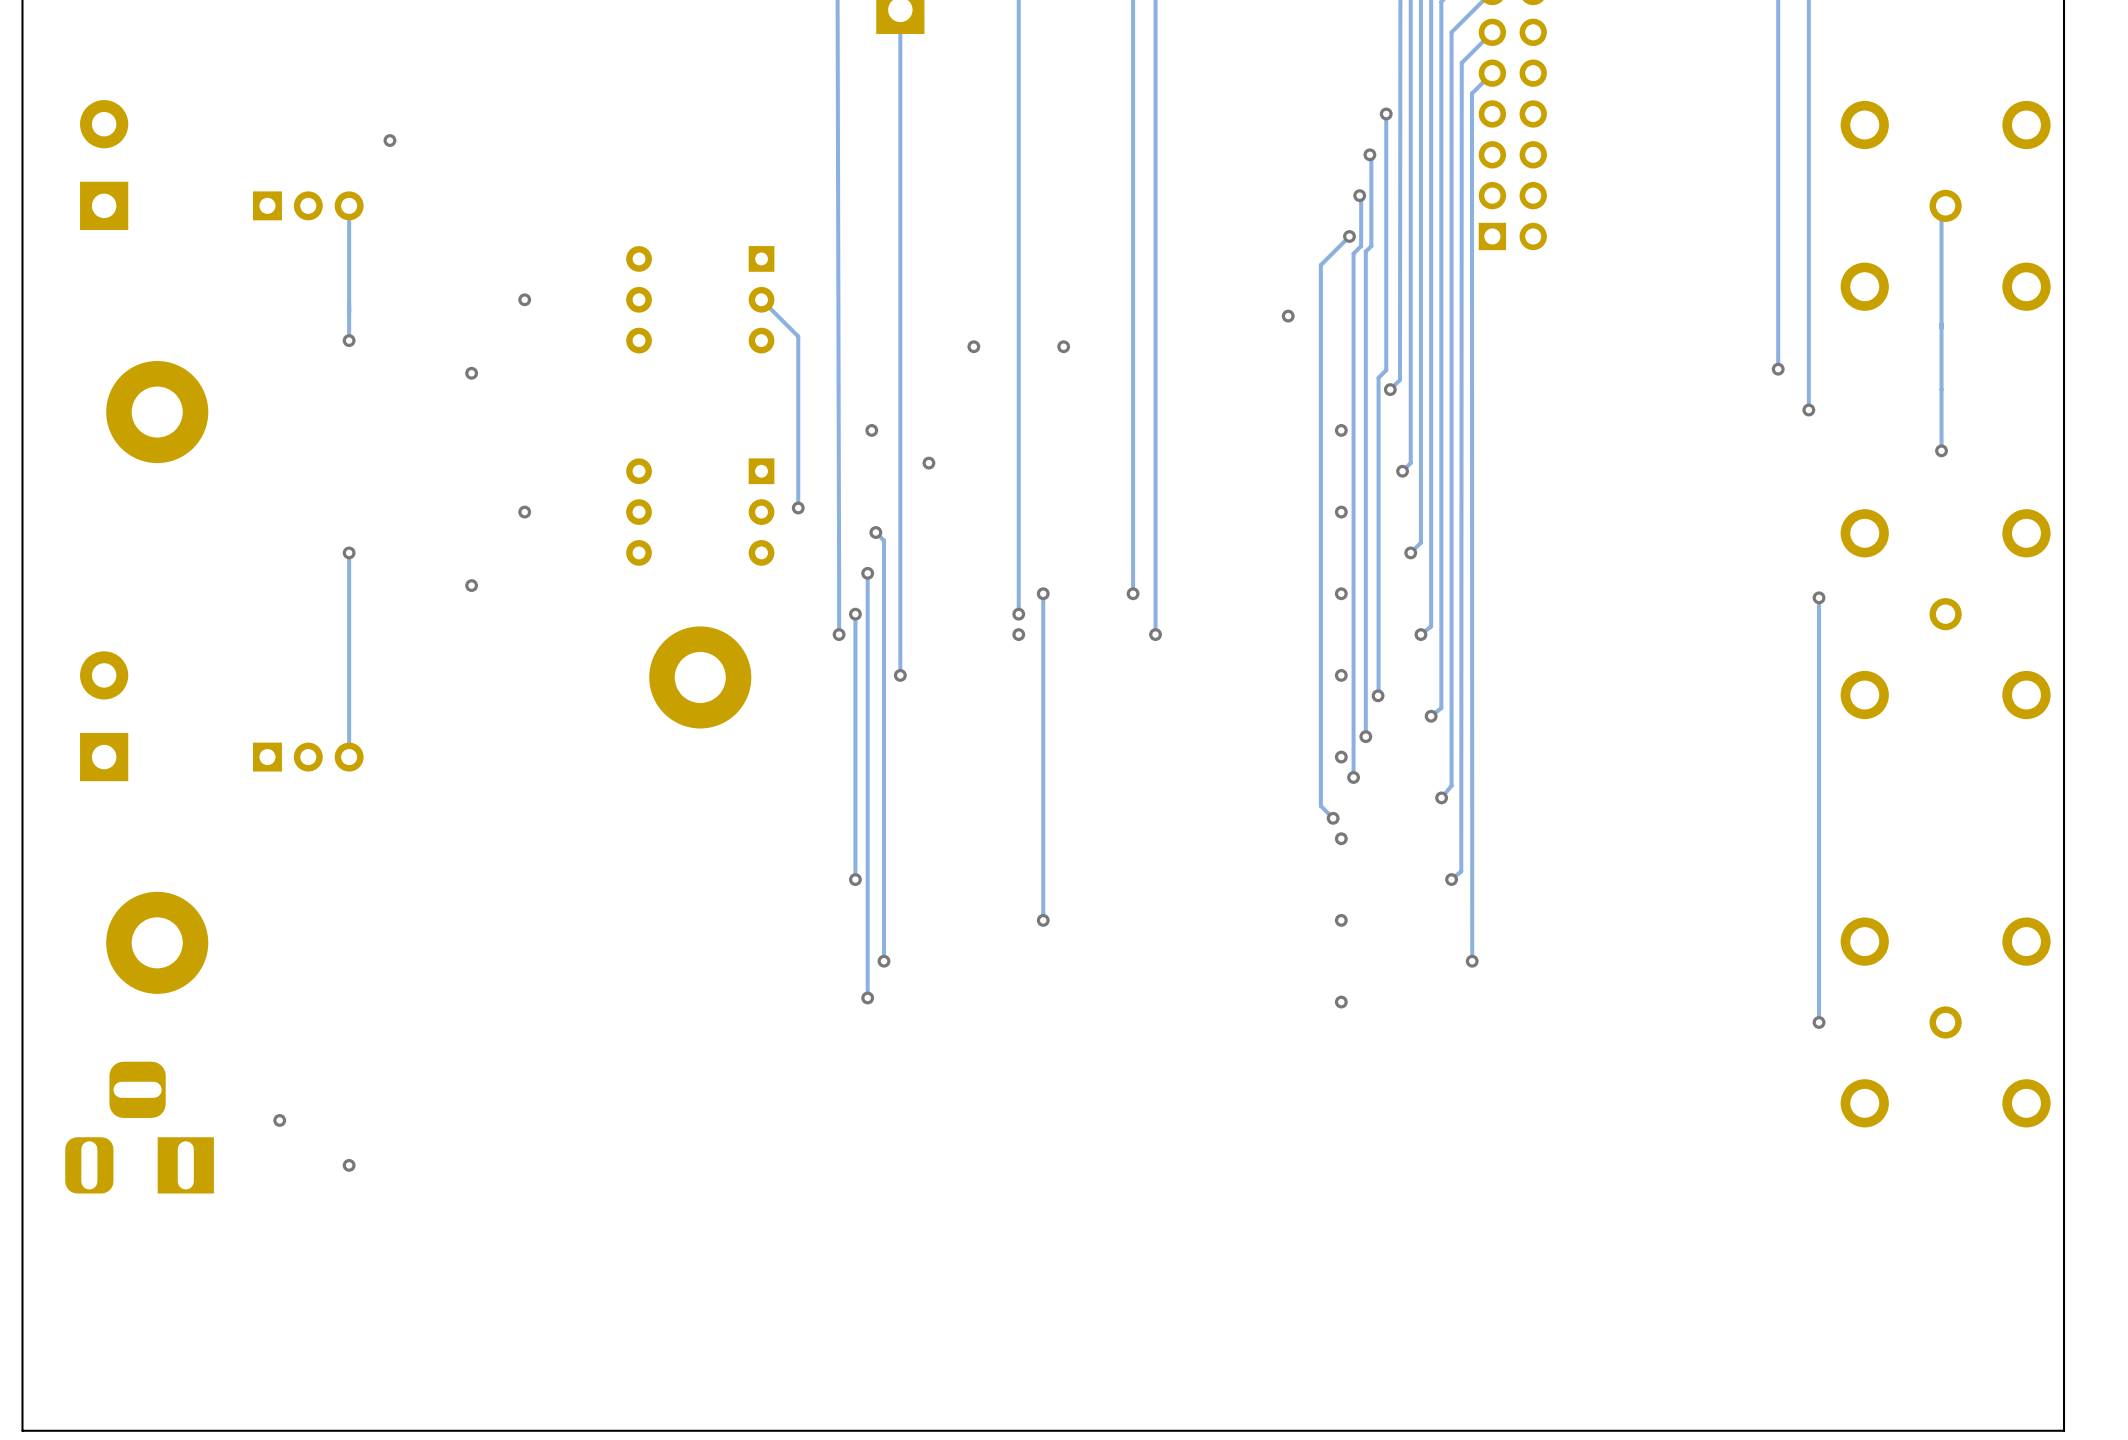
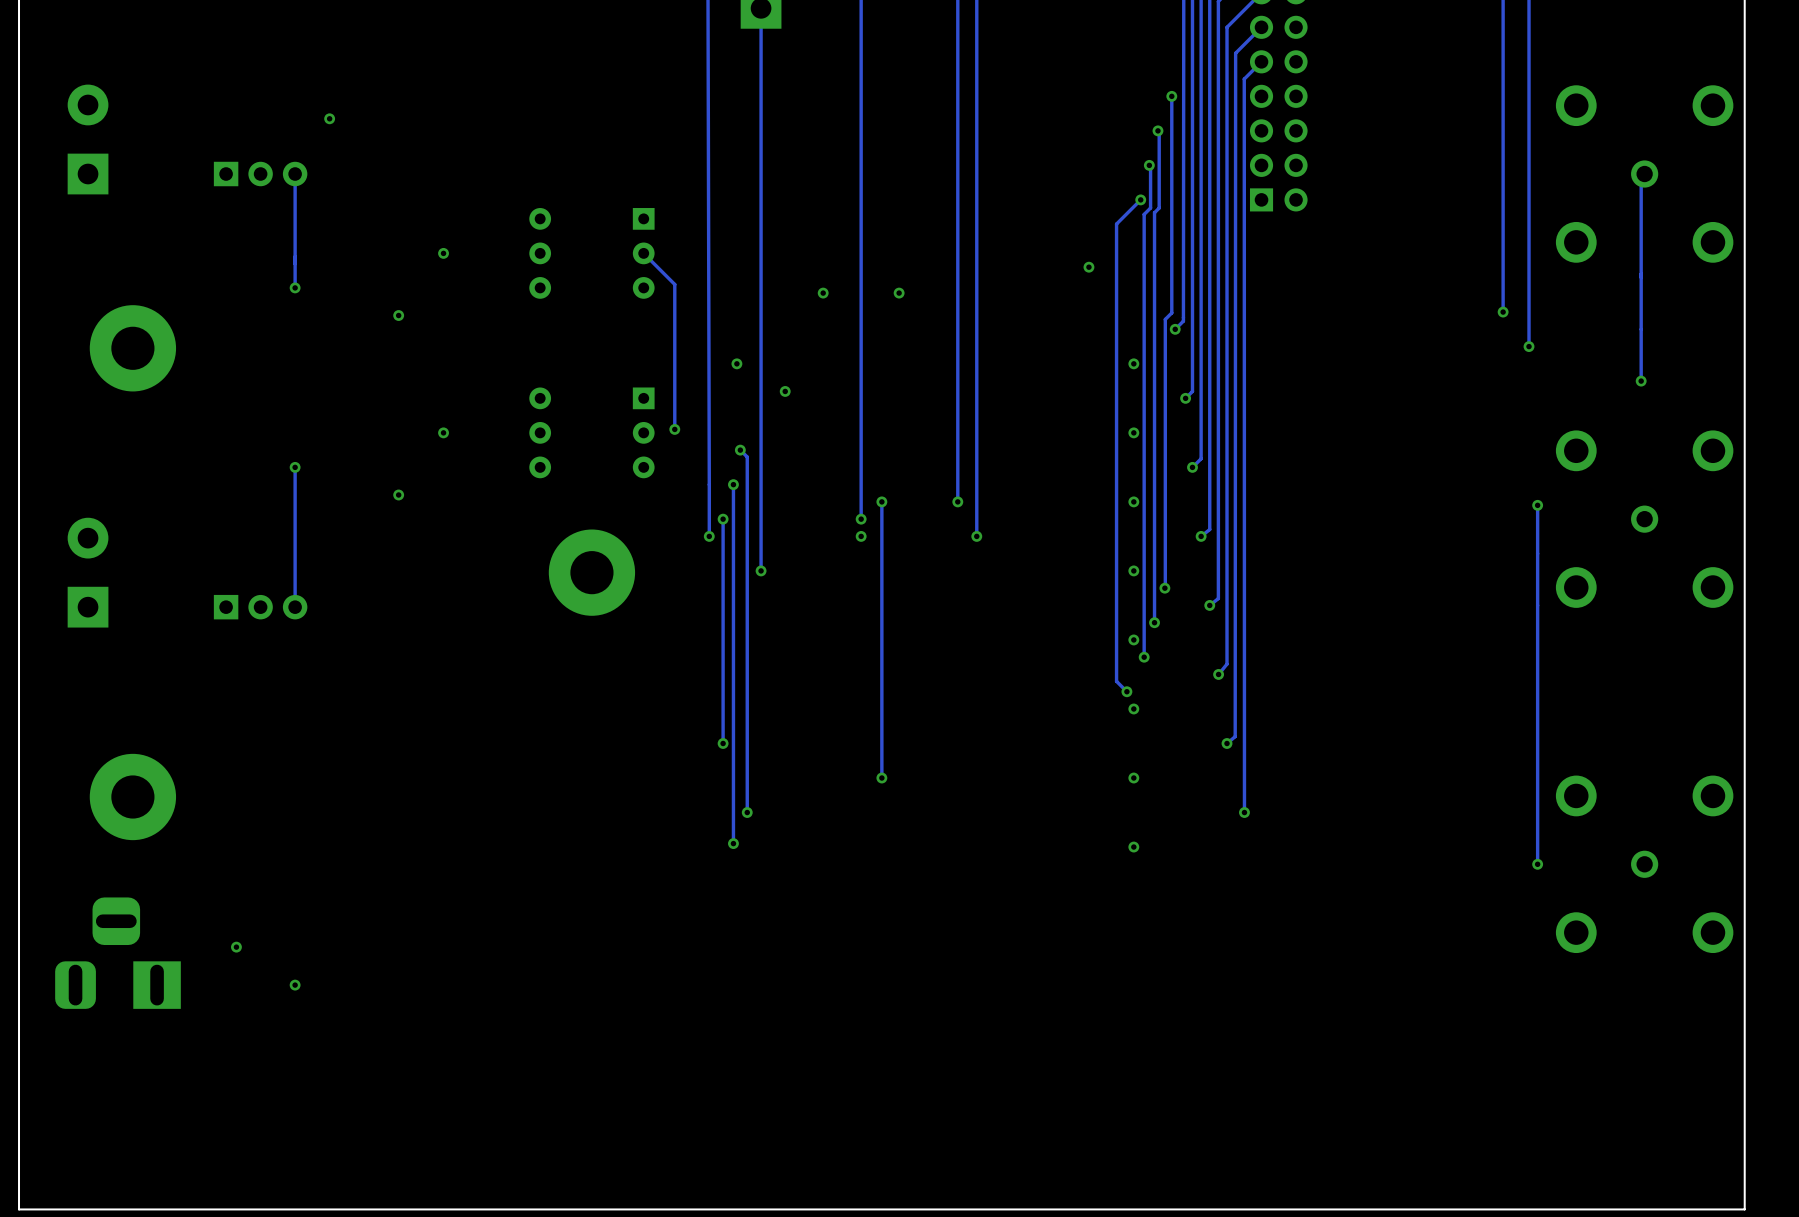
part position: (104, 716) -> (88, 572)
track: (349, 718) (349, 757) -> none
part position: (308, 757) -> (260, 607)

